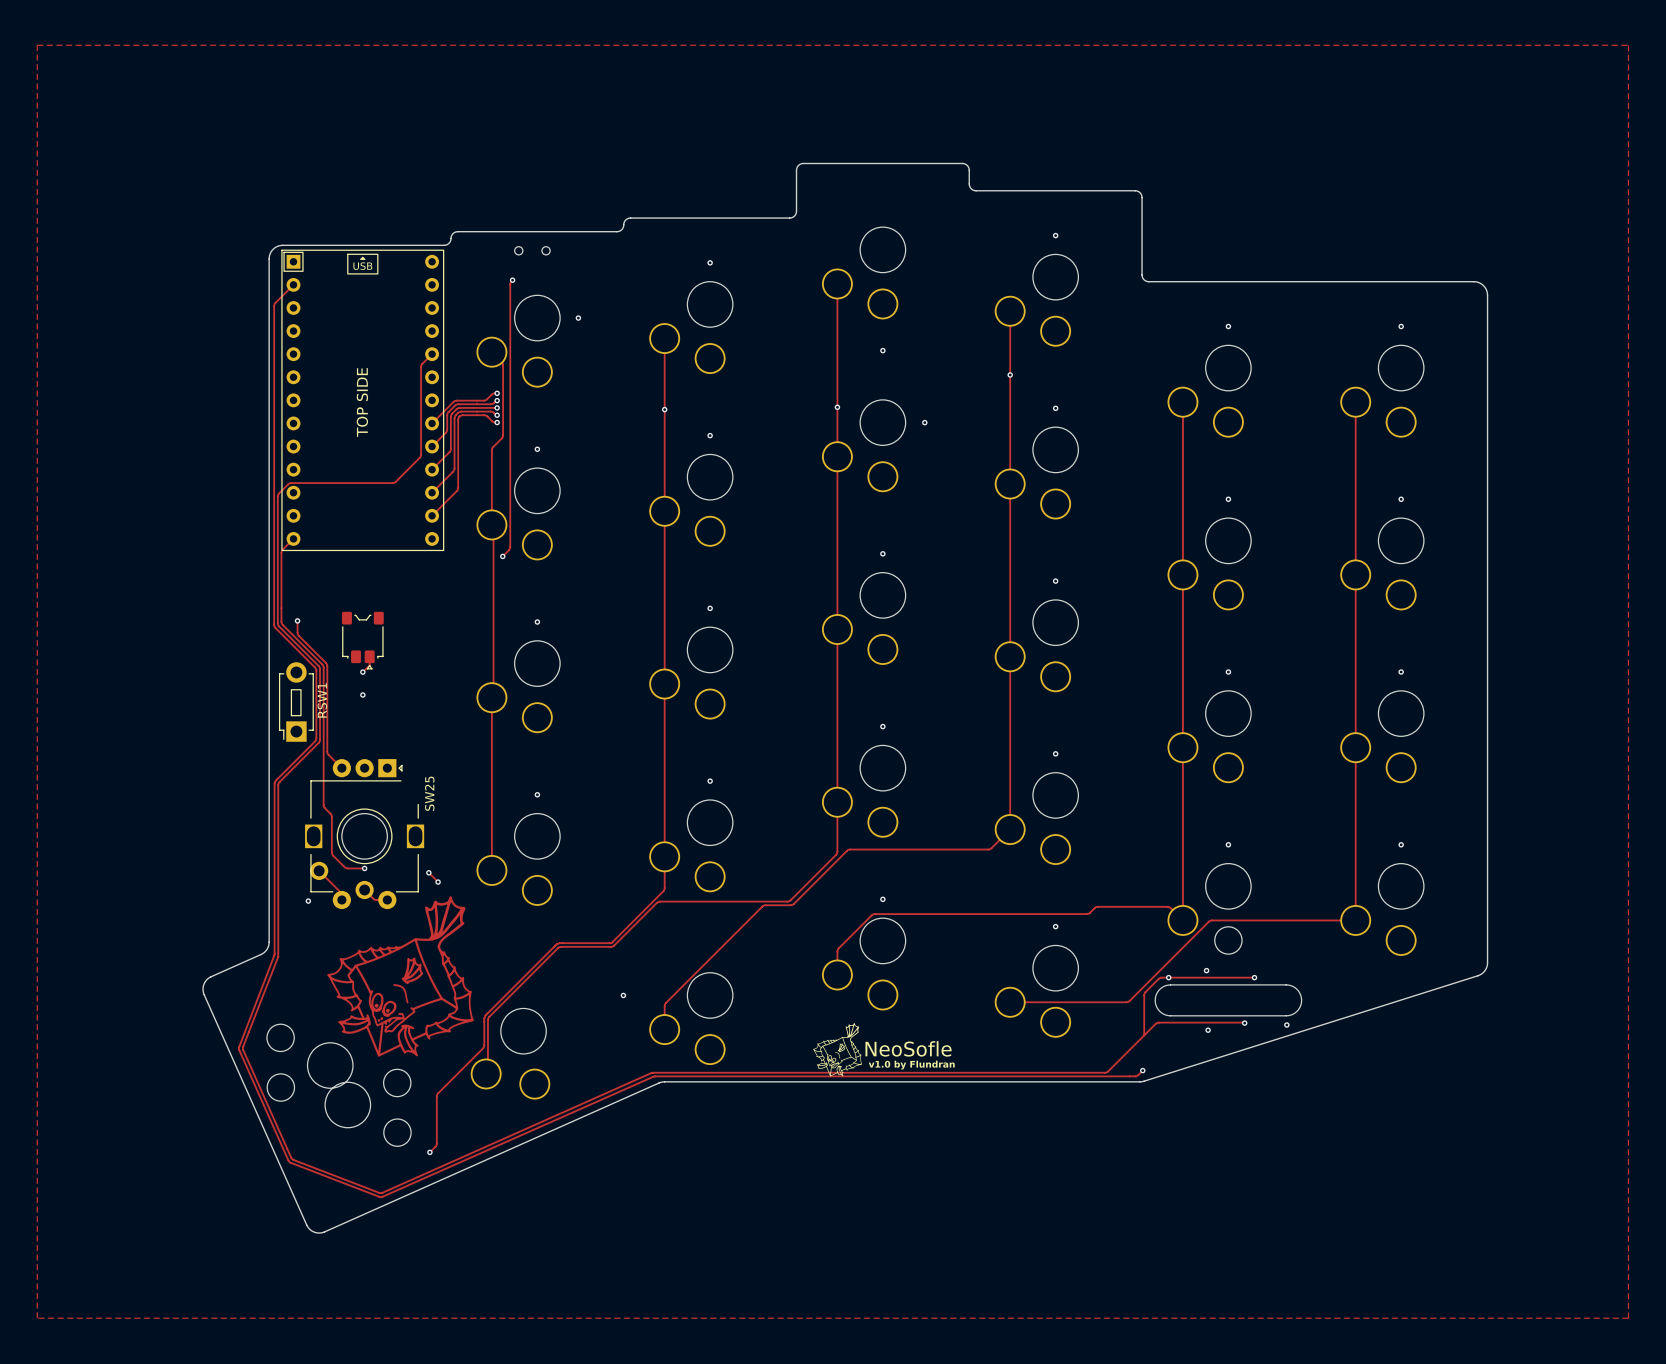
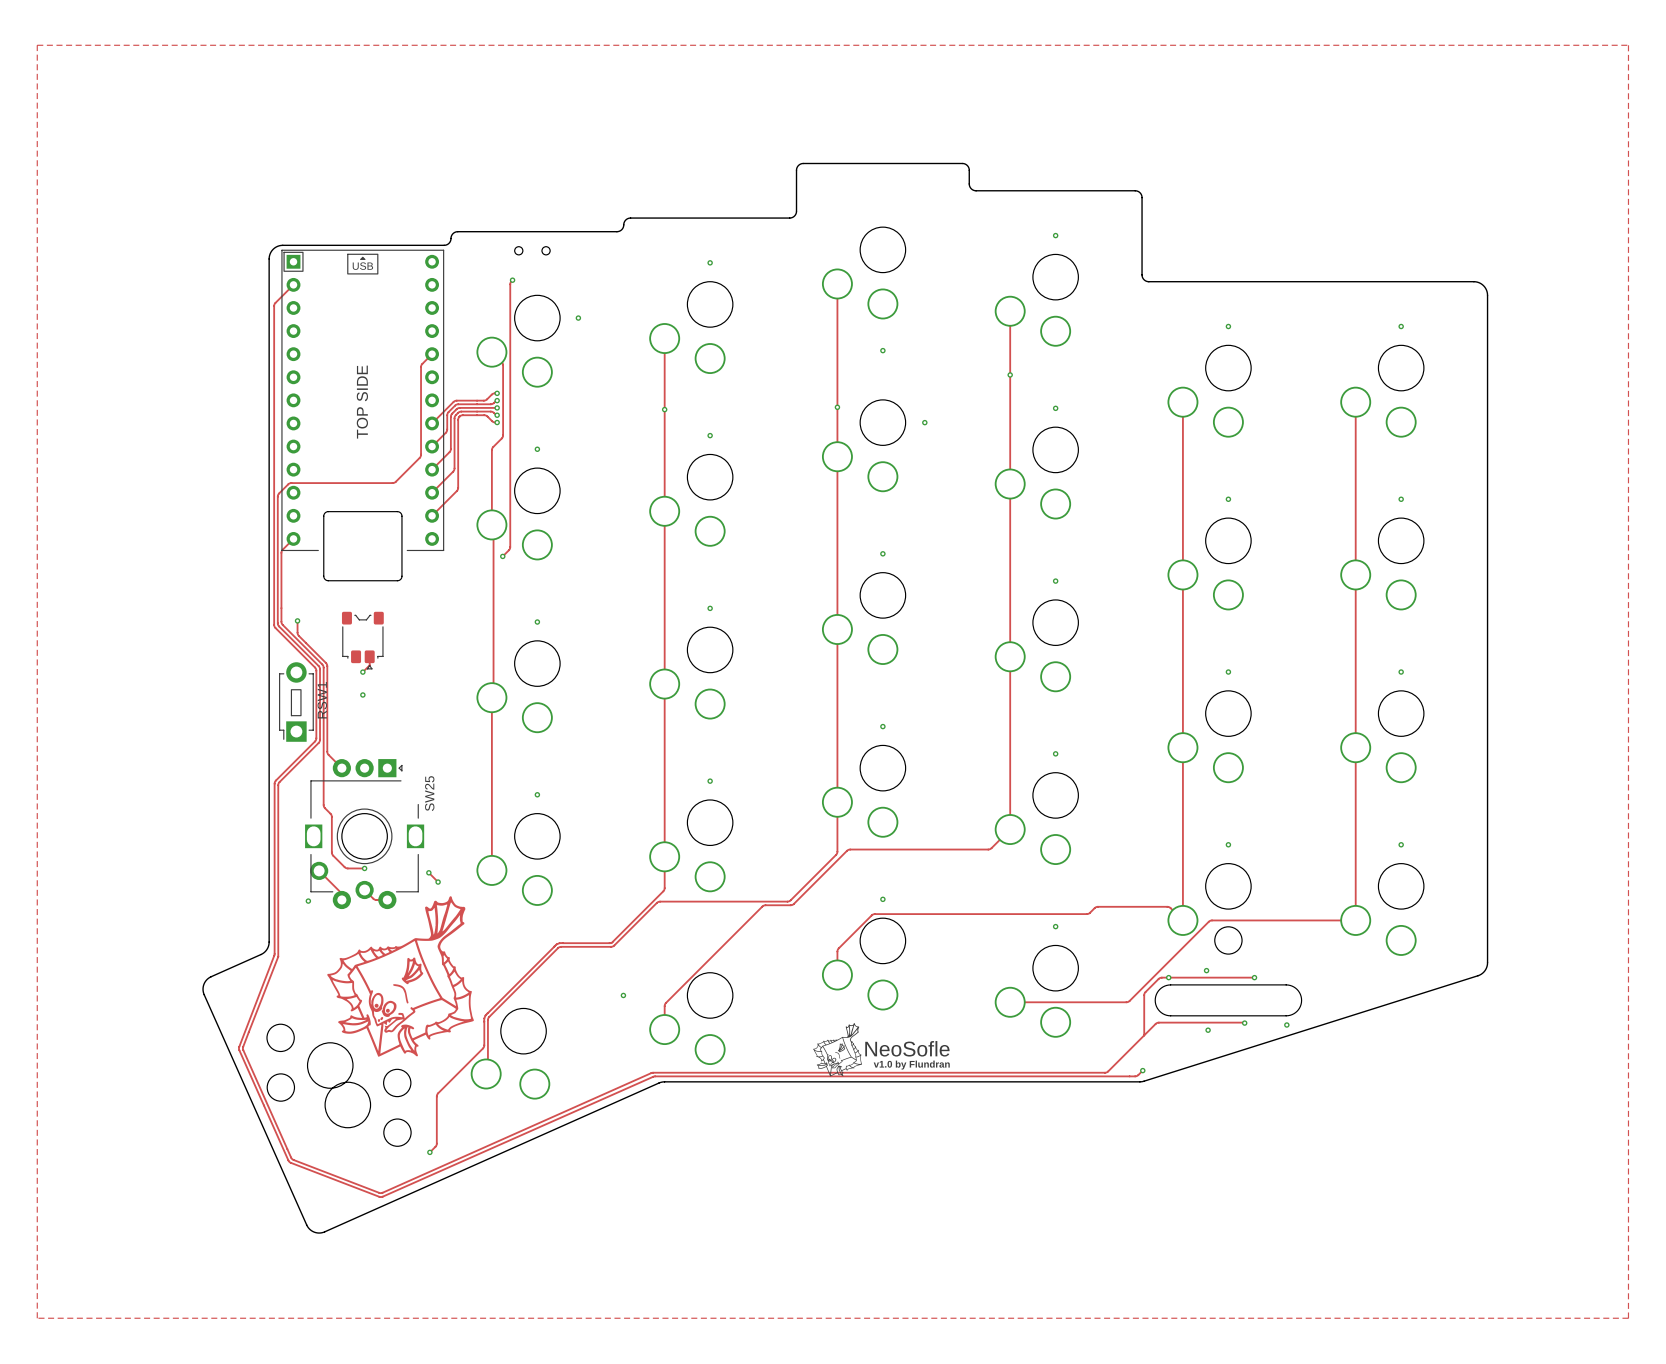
part footprint: [281, 249, 445, 552] -> [281, 249, 445, 552]
board edge: none -> (328, 511) (400, 512) (400, 579) (325, 579) (323, 516) (328, 511)

